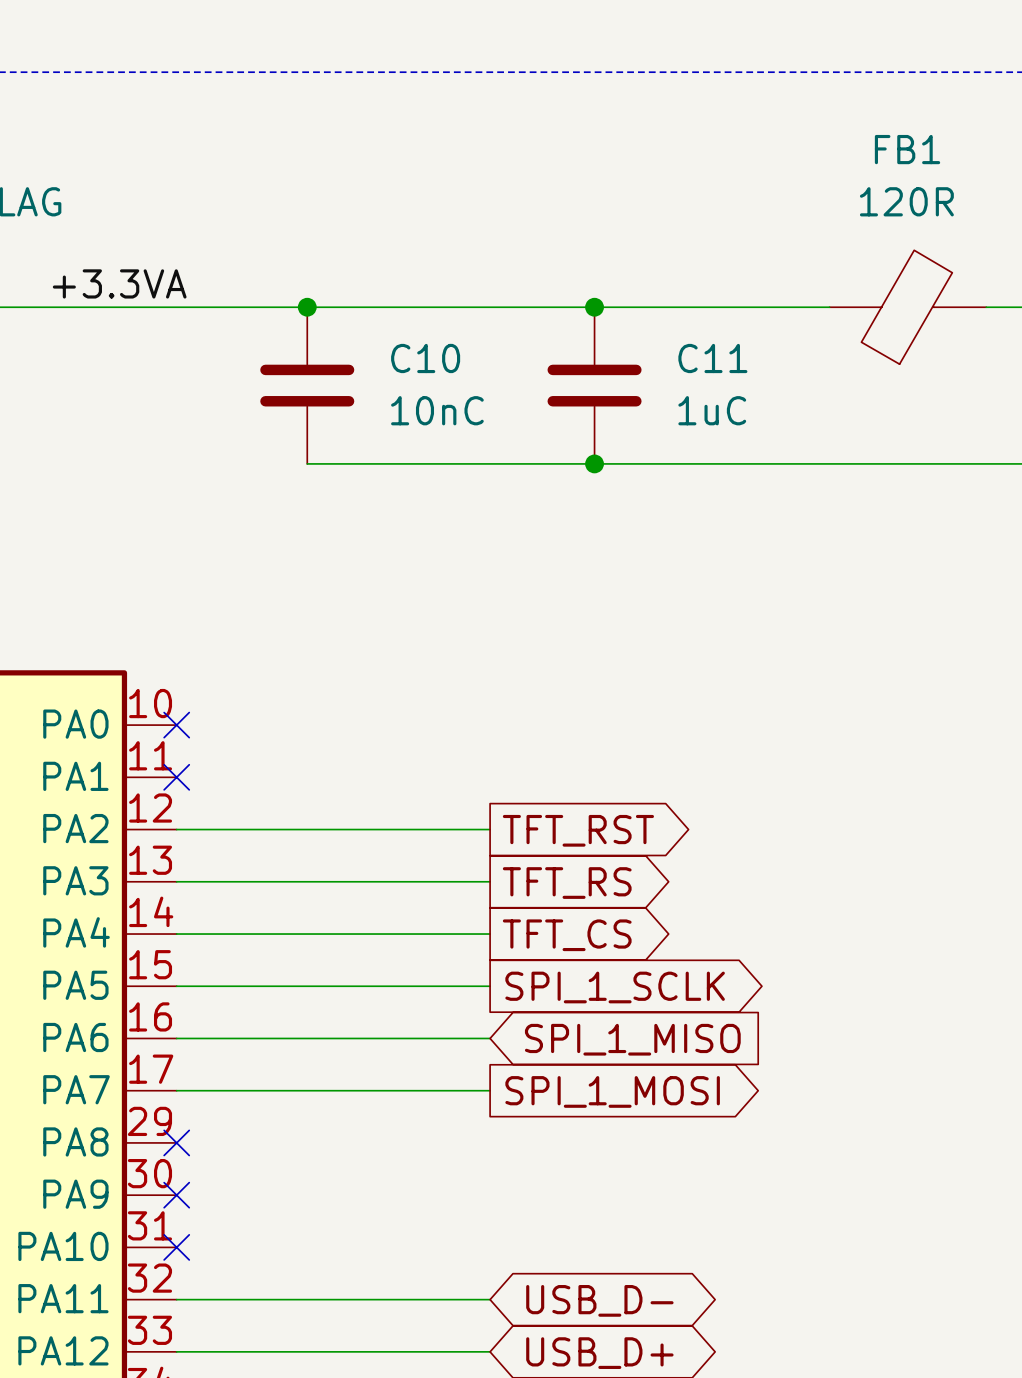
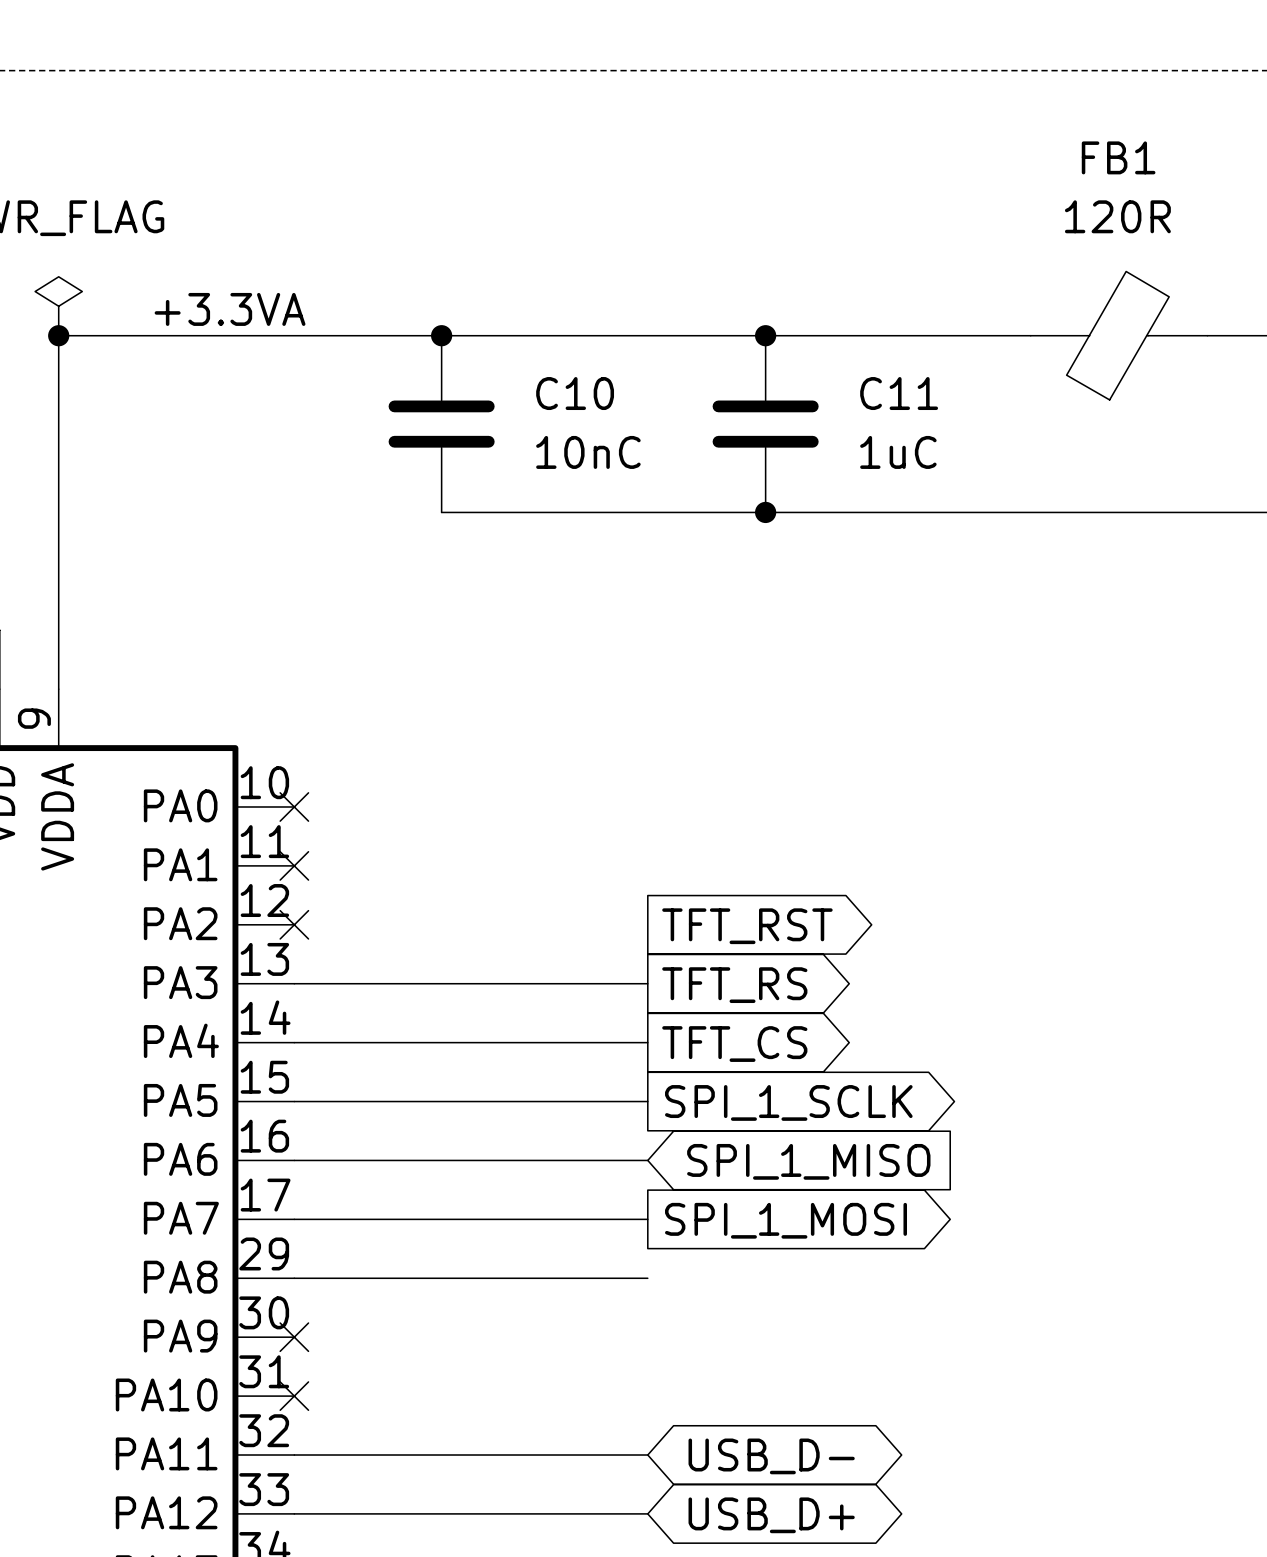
wire: (176, 829) (490, 829) -> (294, 1278) (647, 1278)
no-connect mark: none -> (294, 924)
no-connect mark: (176, 1142) -> none

